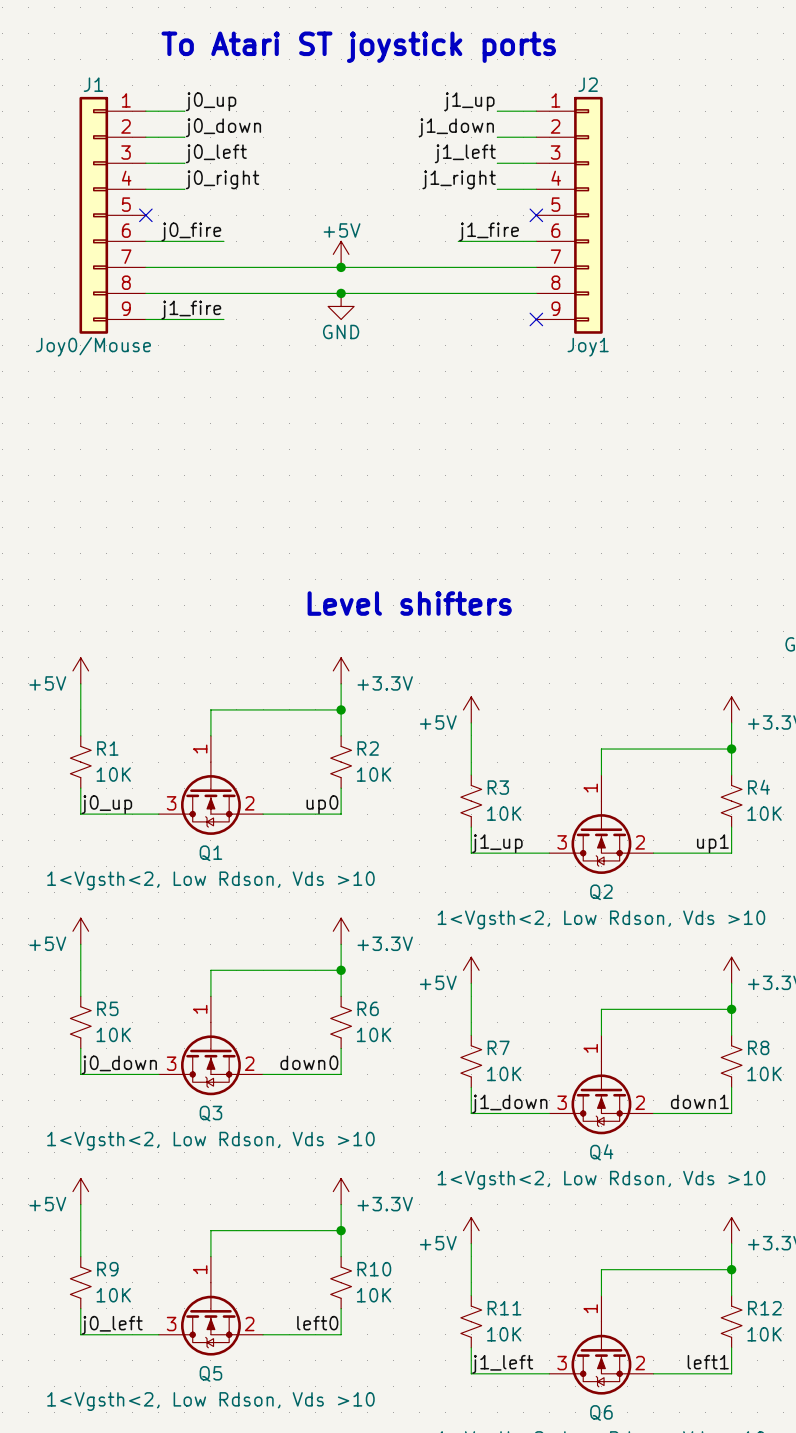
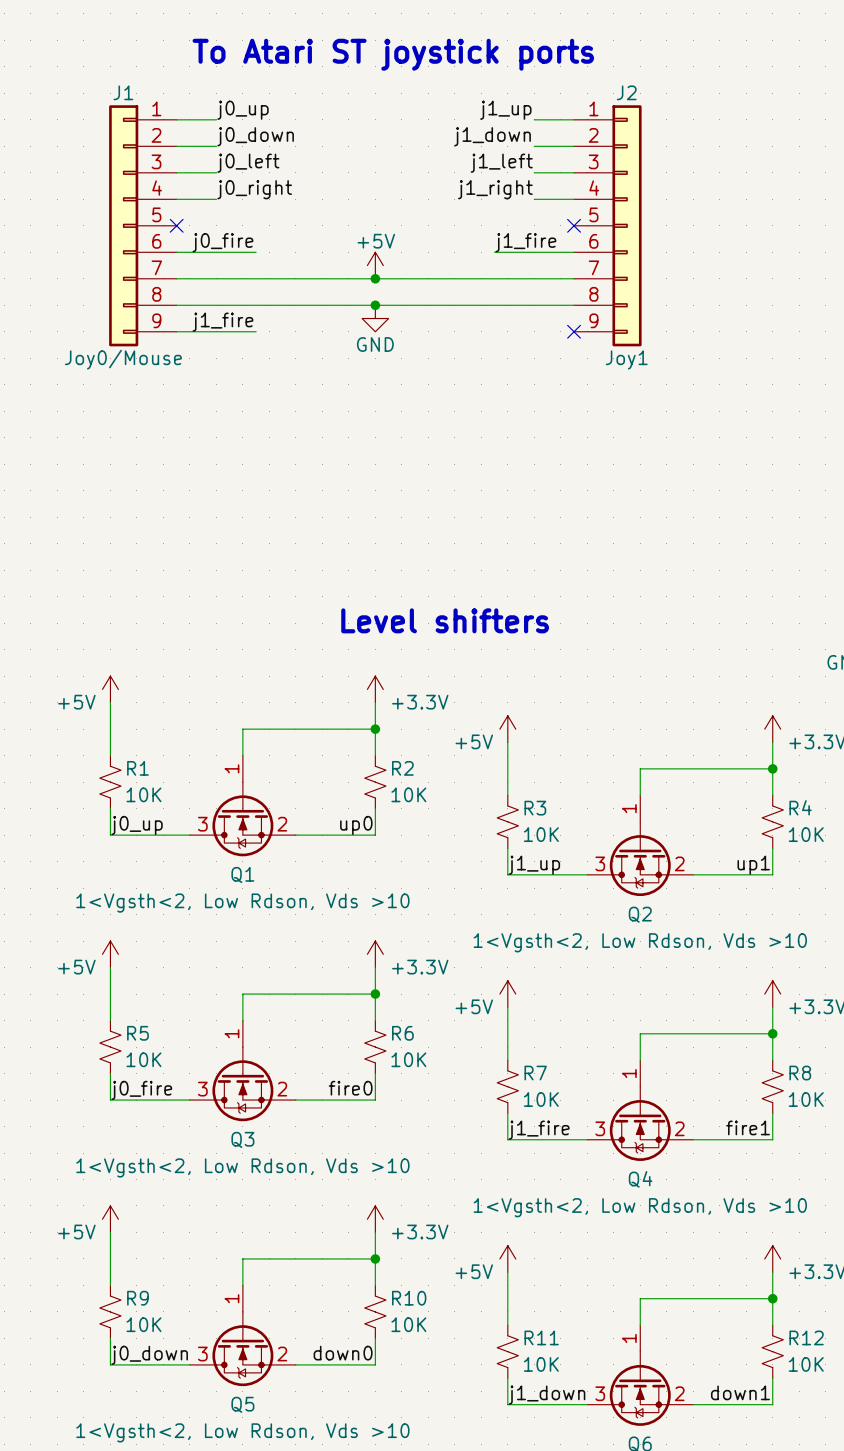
label: down0 (309, 1062) -> fire0 (350, 1088)
label: j0_down (119, 1064) -> j0_fire (141, 1090)
label: down1 (699, 1101) -> fire1 (748, 1127)
label: j1_down (509, 1104) -> j1_fire (539, 1130)
label: left0 (317, 1323) -> down0 (343, 1353)
label: j0_left (112, 1325) -> j0_down (149, 1355)
label: left1 (708, 1362) -> down1 (740, 1392)
label: j1_left (502, 1364) -> j1_down (547, 1395)

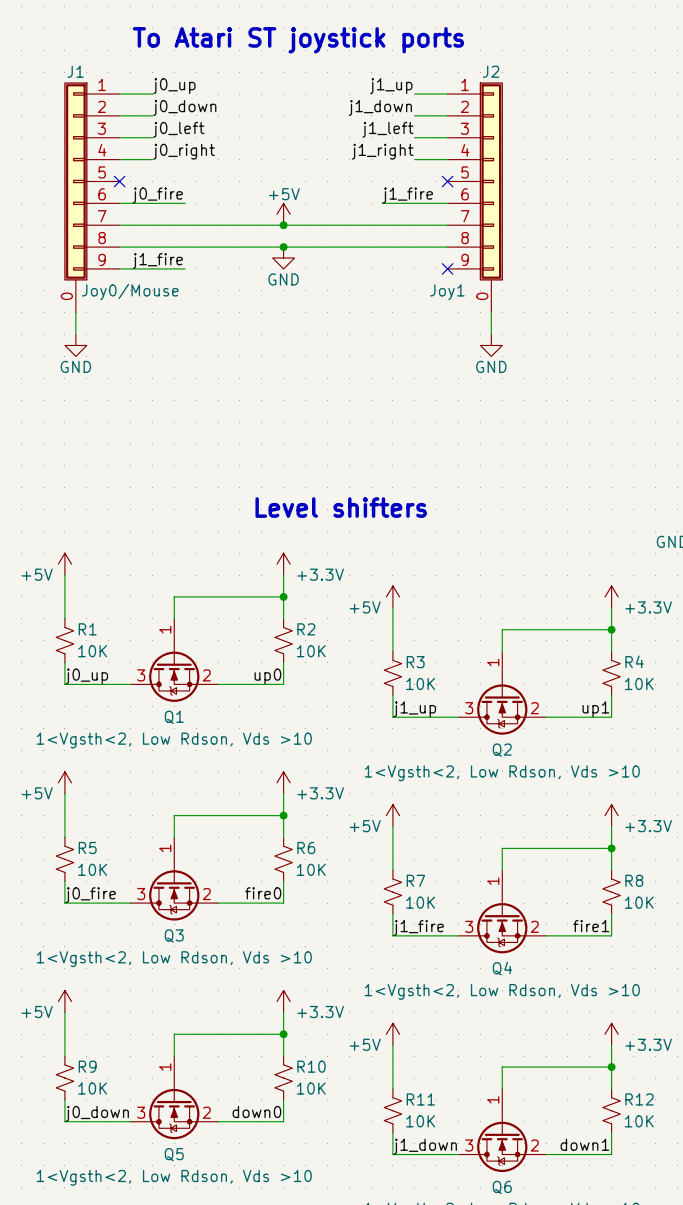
J1 symbol: [109, 105, 177, 347] -> [64, 82, 120, 313]
J2 symbol: [574, 105, 642, 347] -> [447, 82, 503, 313]
J1 value position: Joy0/Mouse (123, 359) -> Joy0/Mouse (130, 291)
J2 value position: Joy1 (626, 359) -> Joy1 (447, 292)
wire: none -> (75, 312) (75, 334)
wire: none -> (491, 312) (491, 334)
power symbol: none -> GND (75, 345)
power symbol: none -> GND (491, 345)

